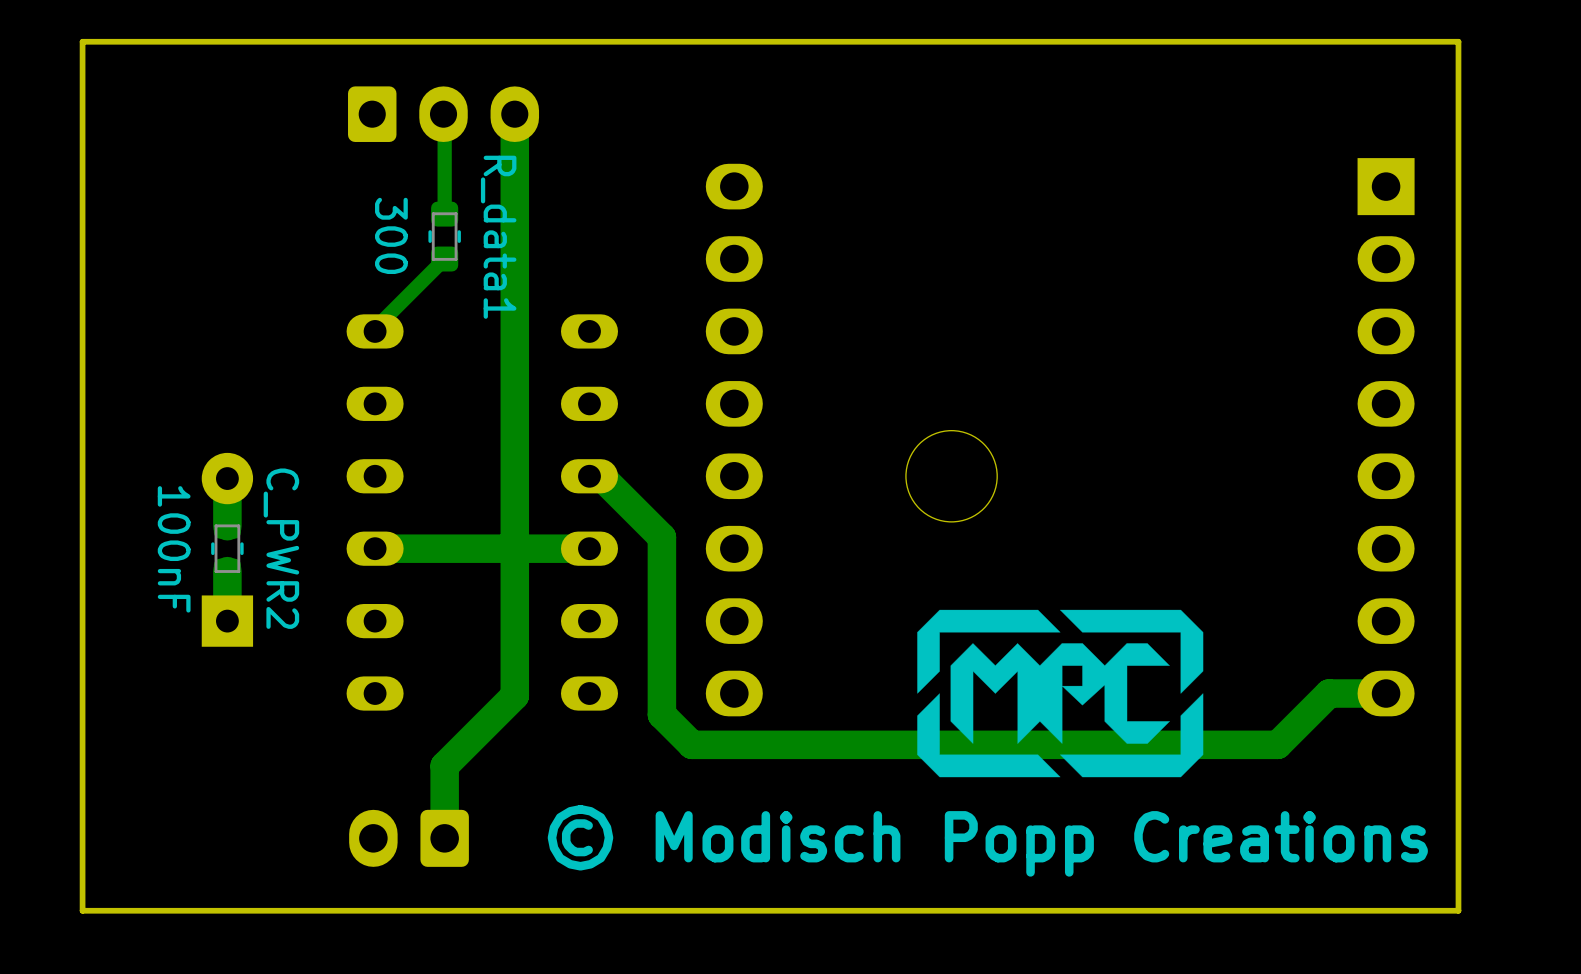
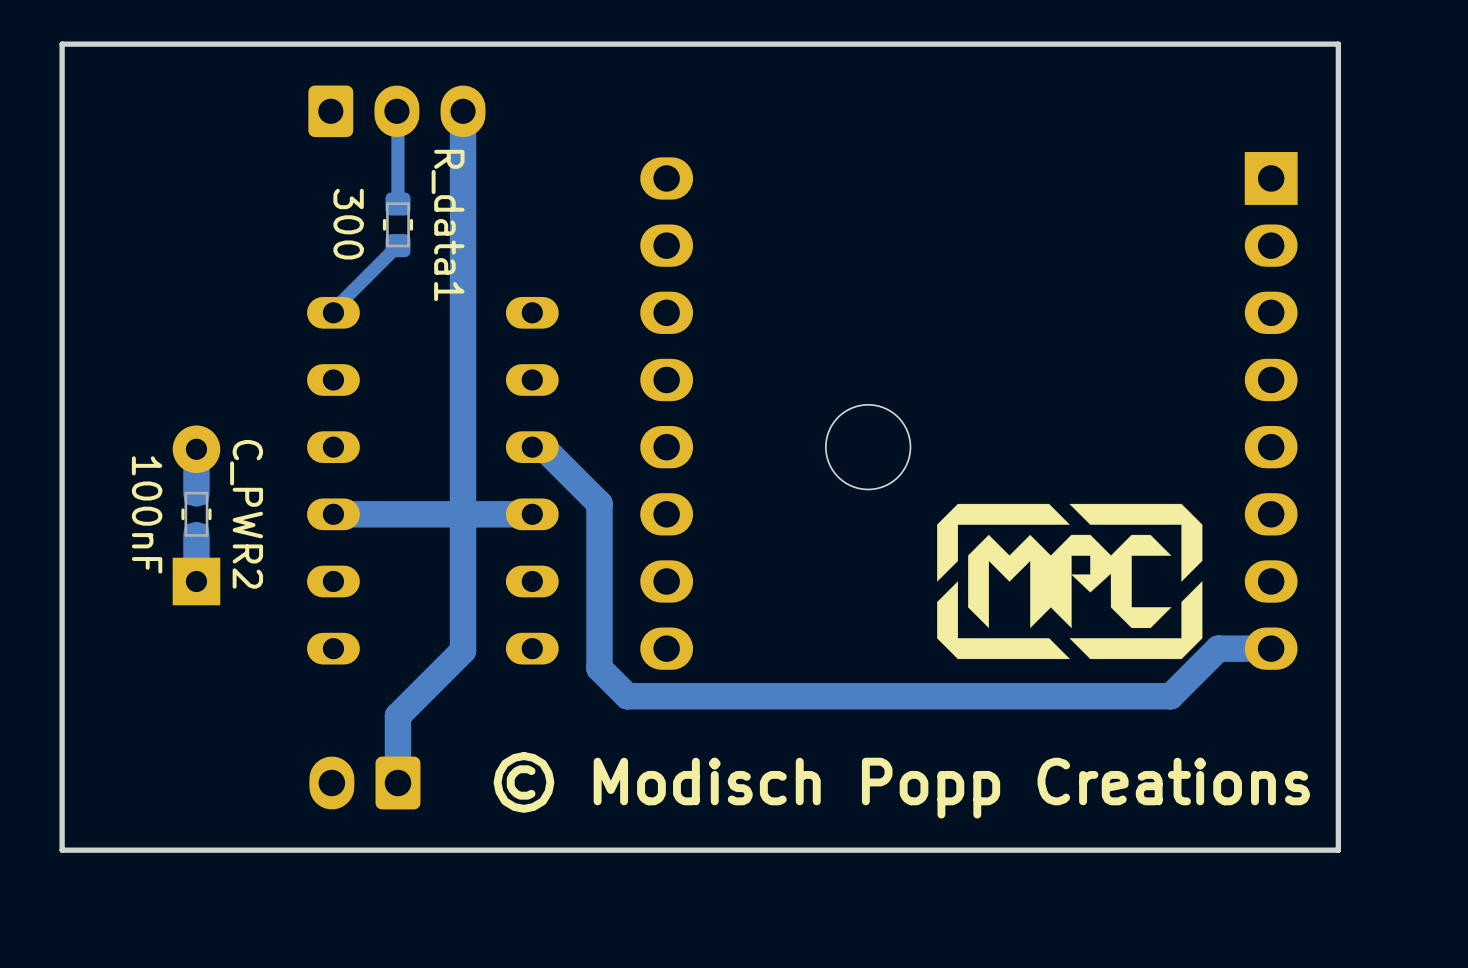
drawing position: (1060, 693) -> (1069, 581)

